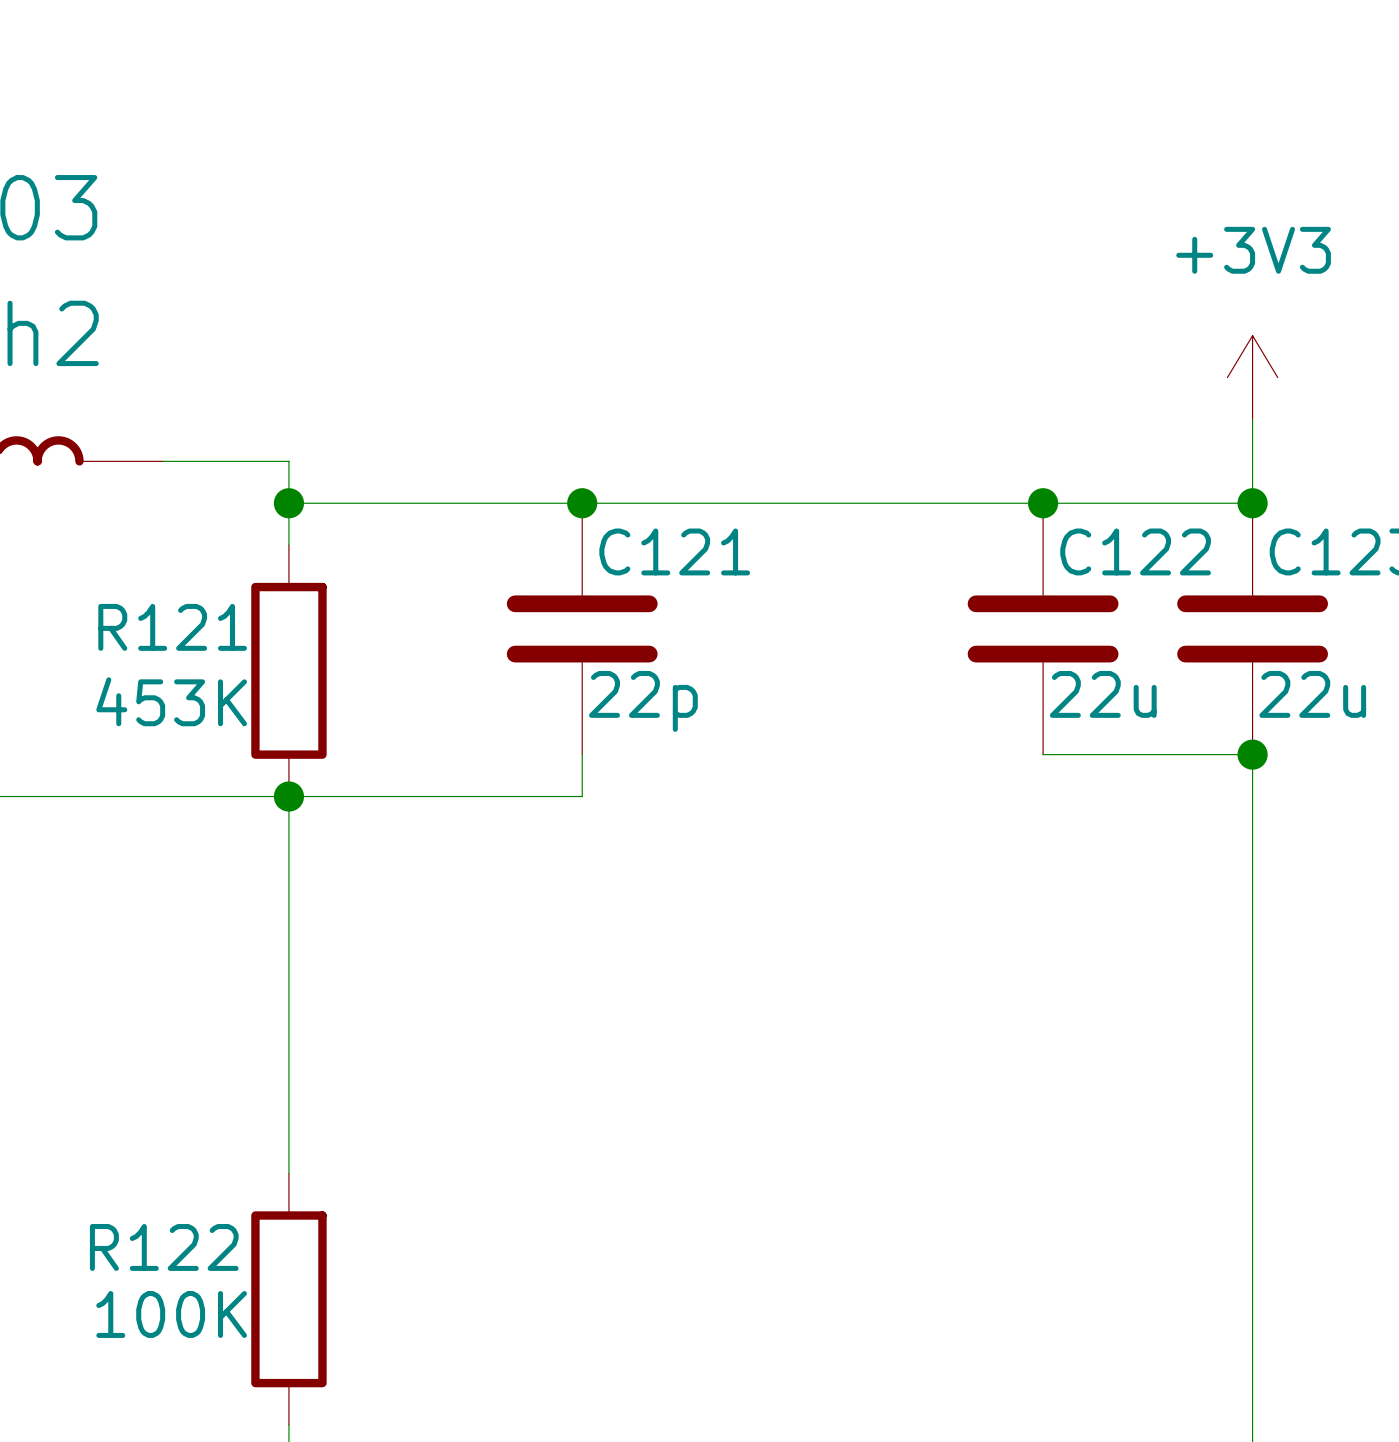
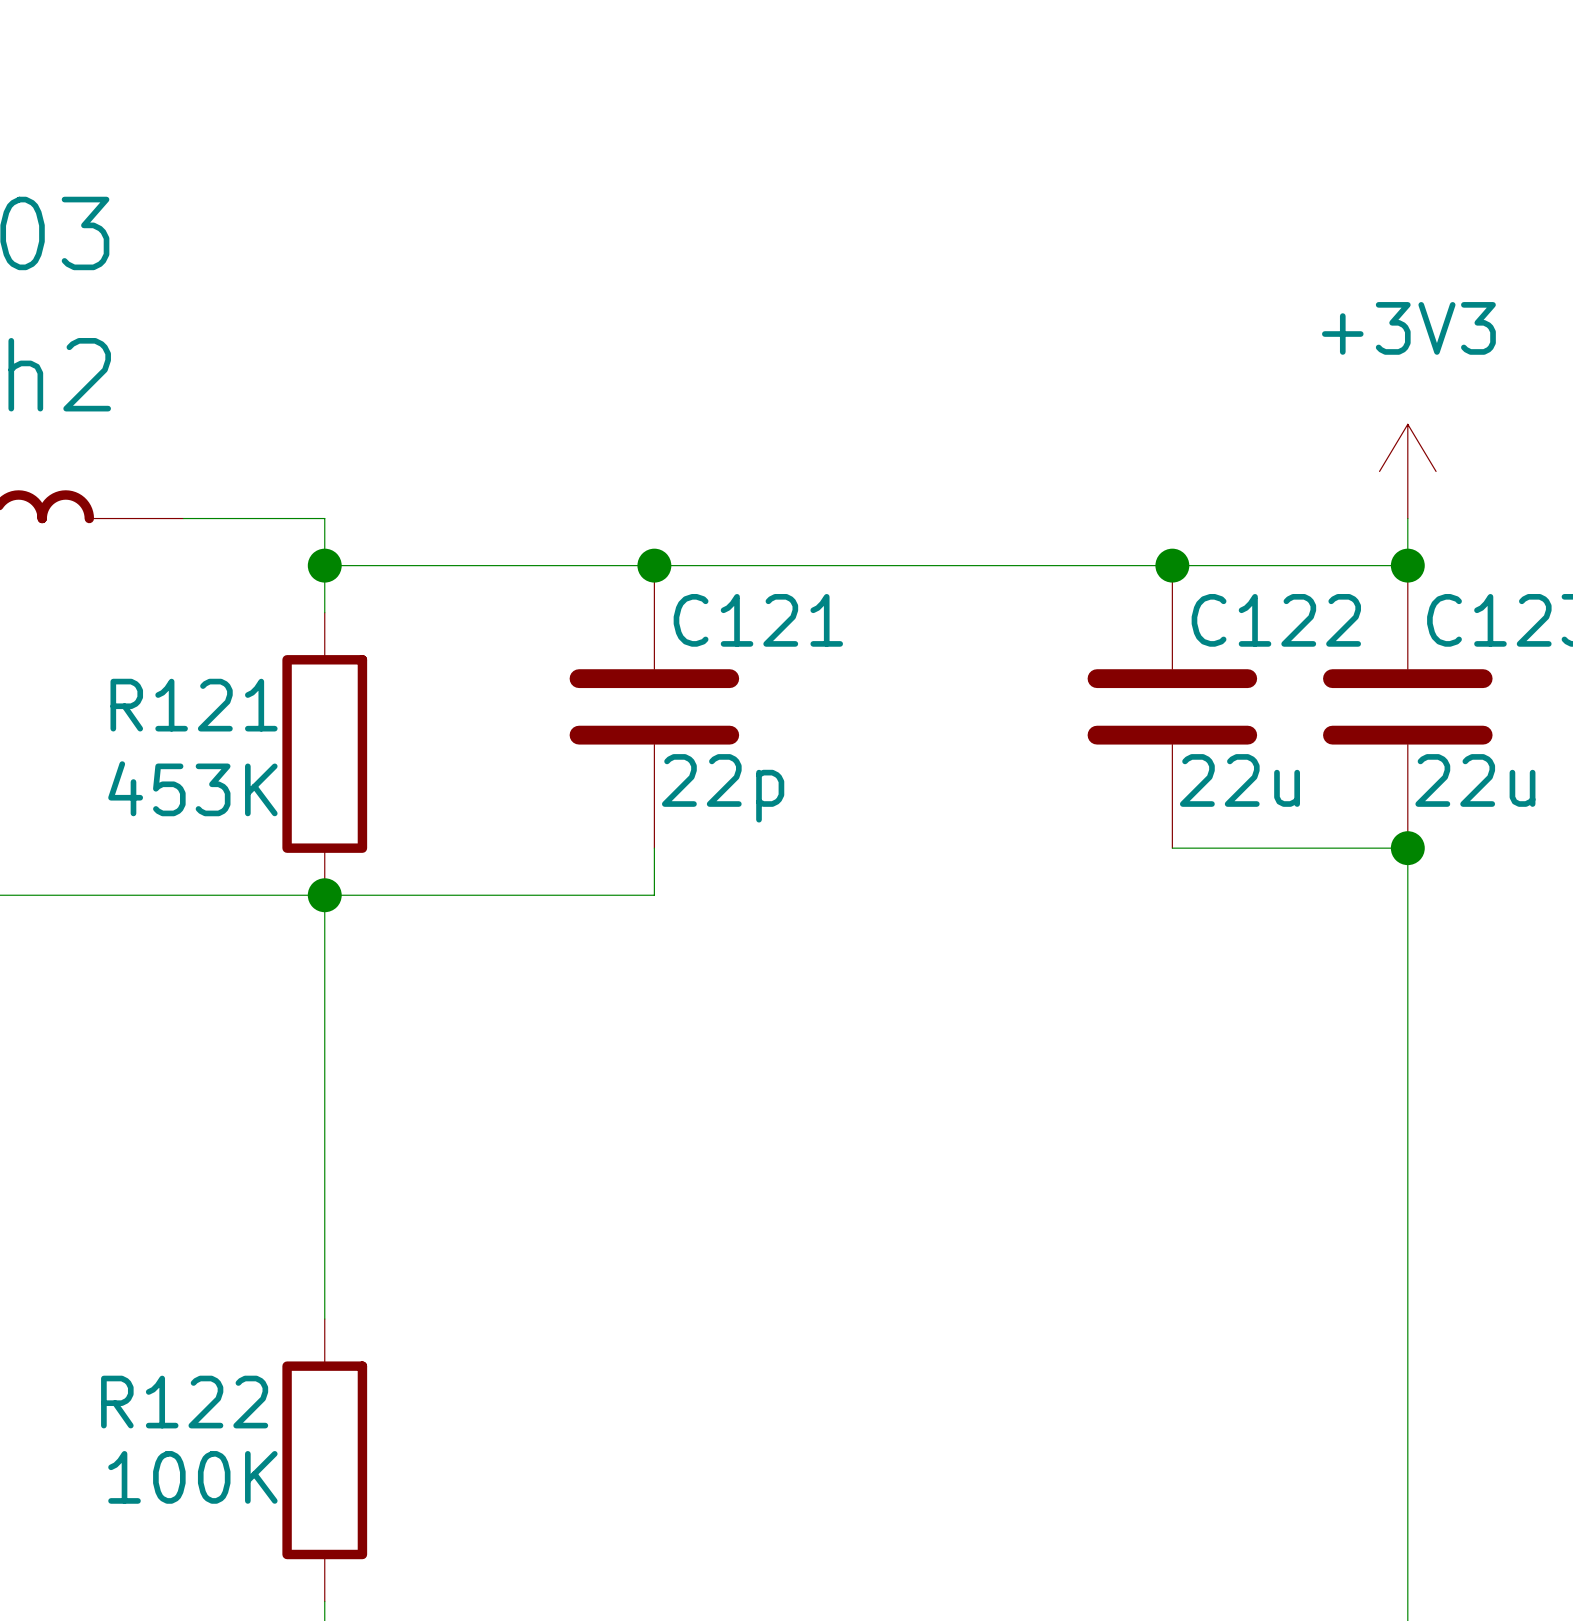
power symbol position: +3V3 (1252, 377) -> +3V3 (1407, 471)

